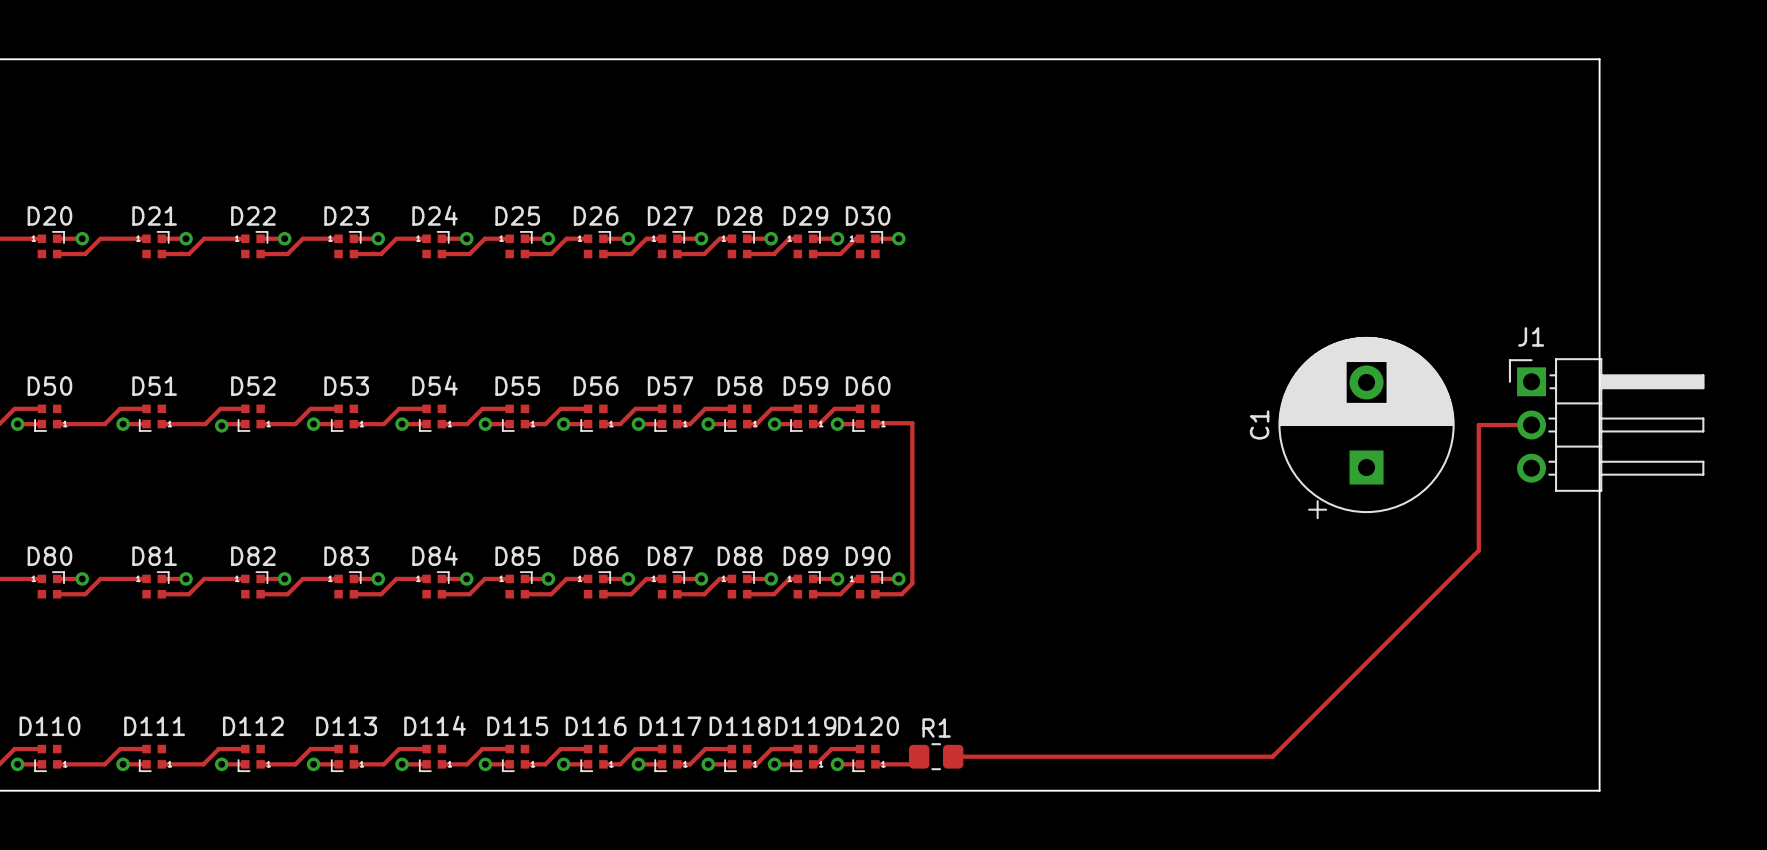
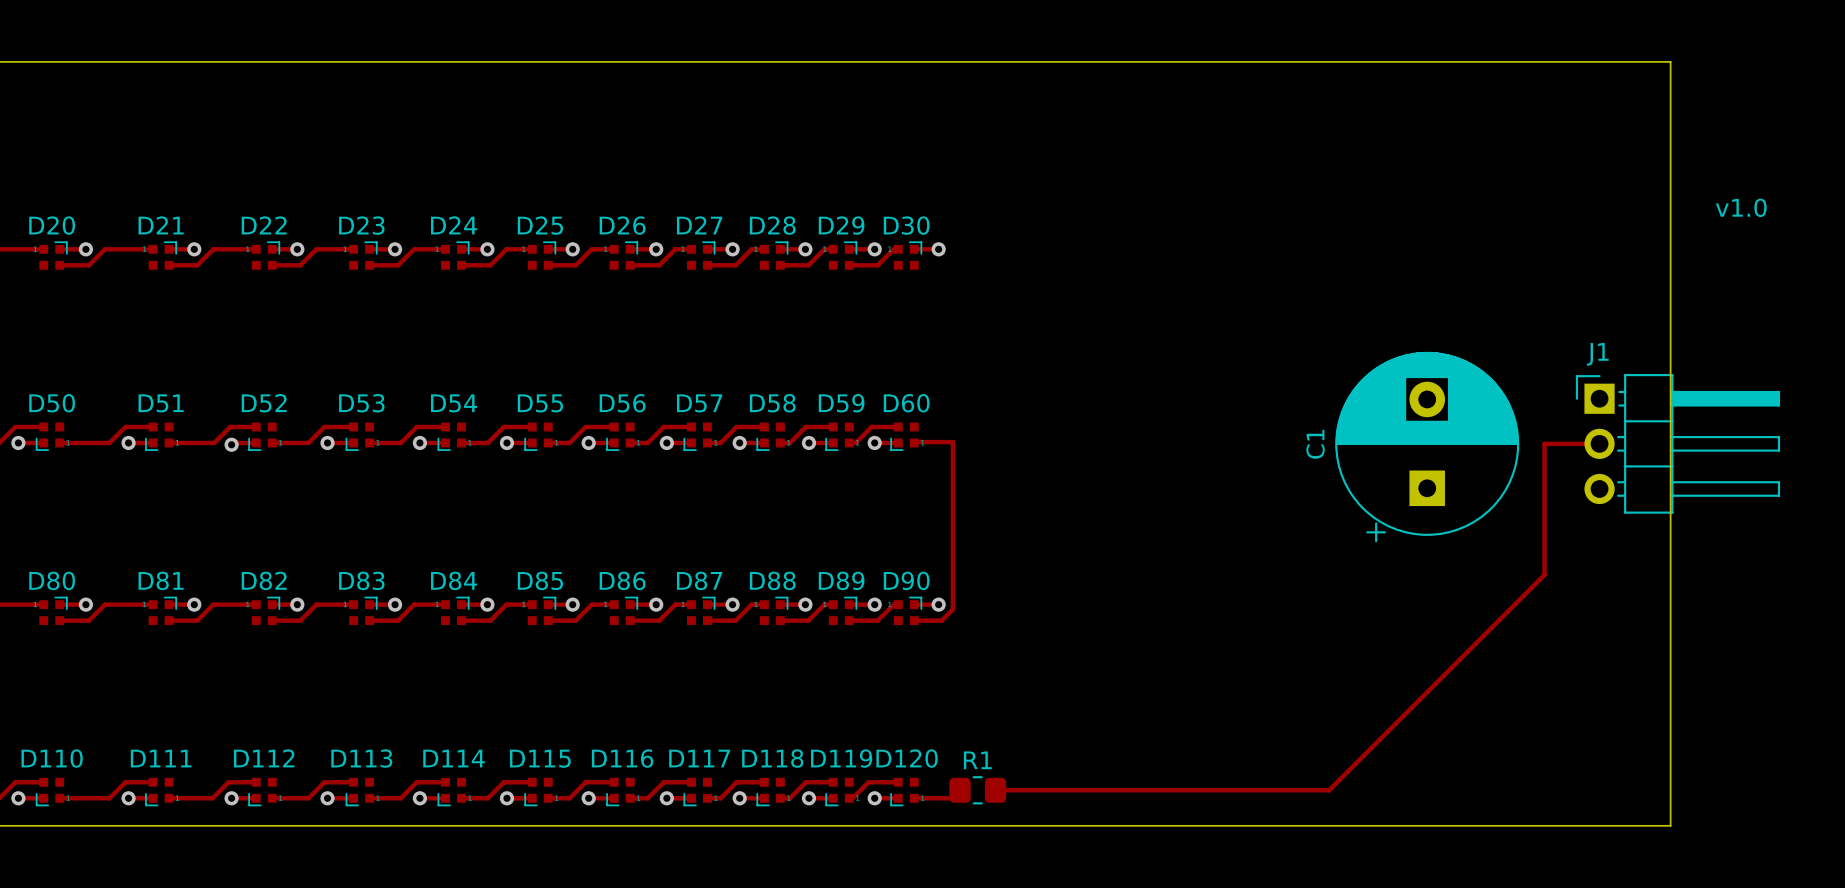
text: none -> v1.0 (1741, 207)

